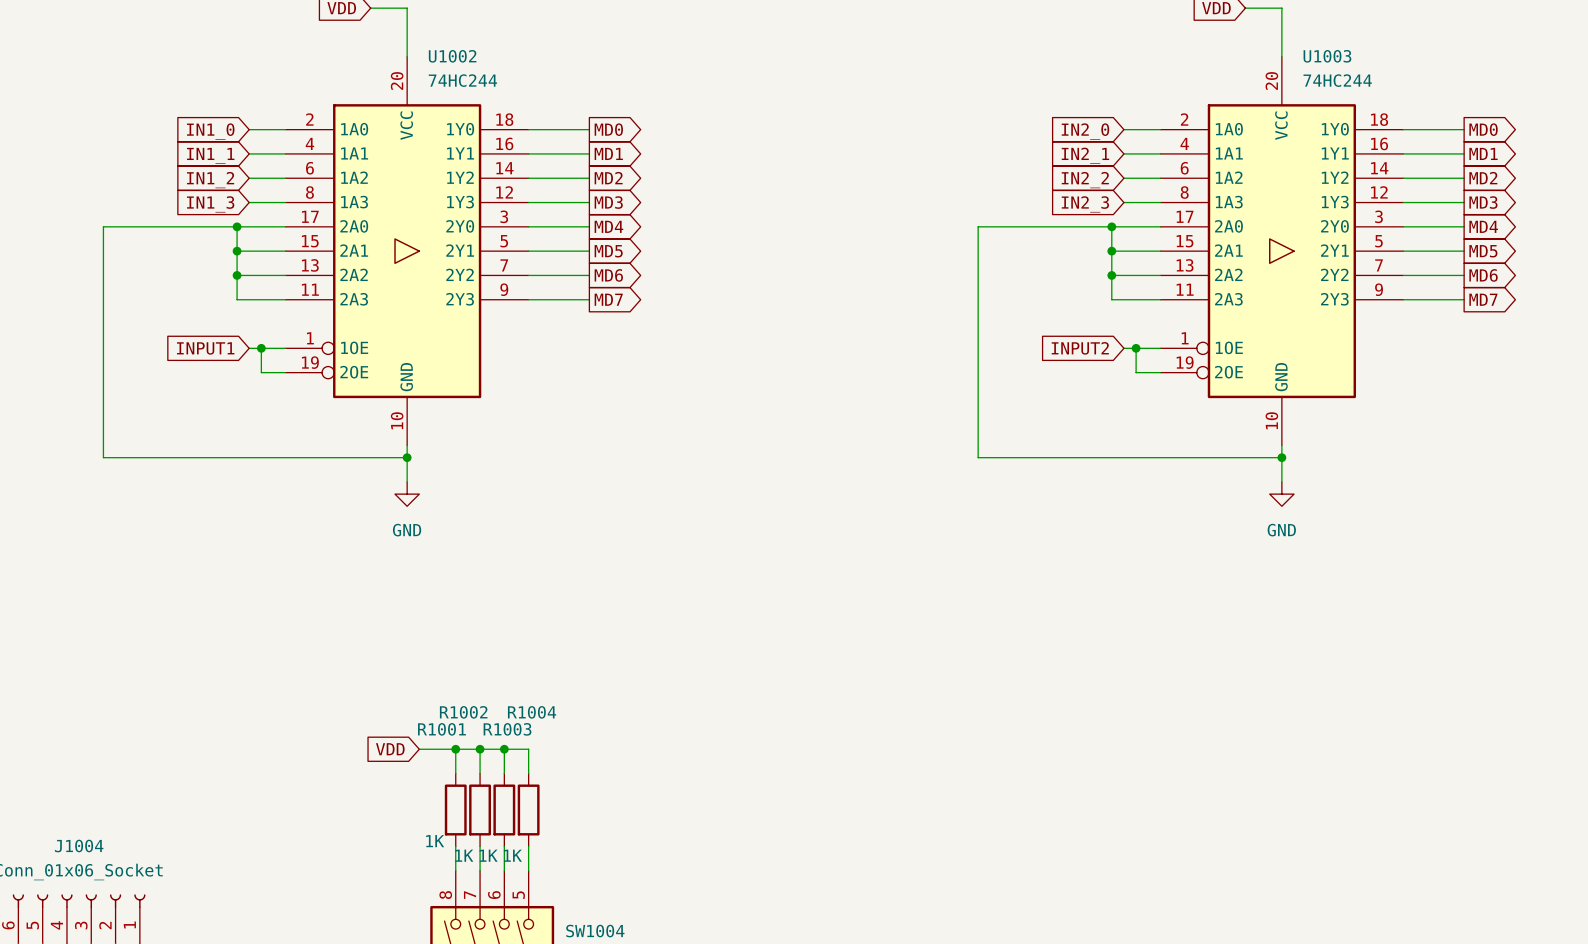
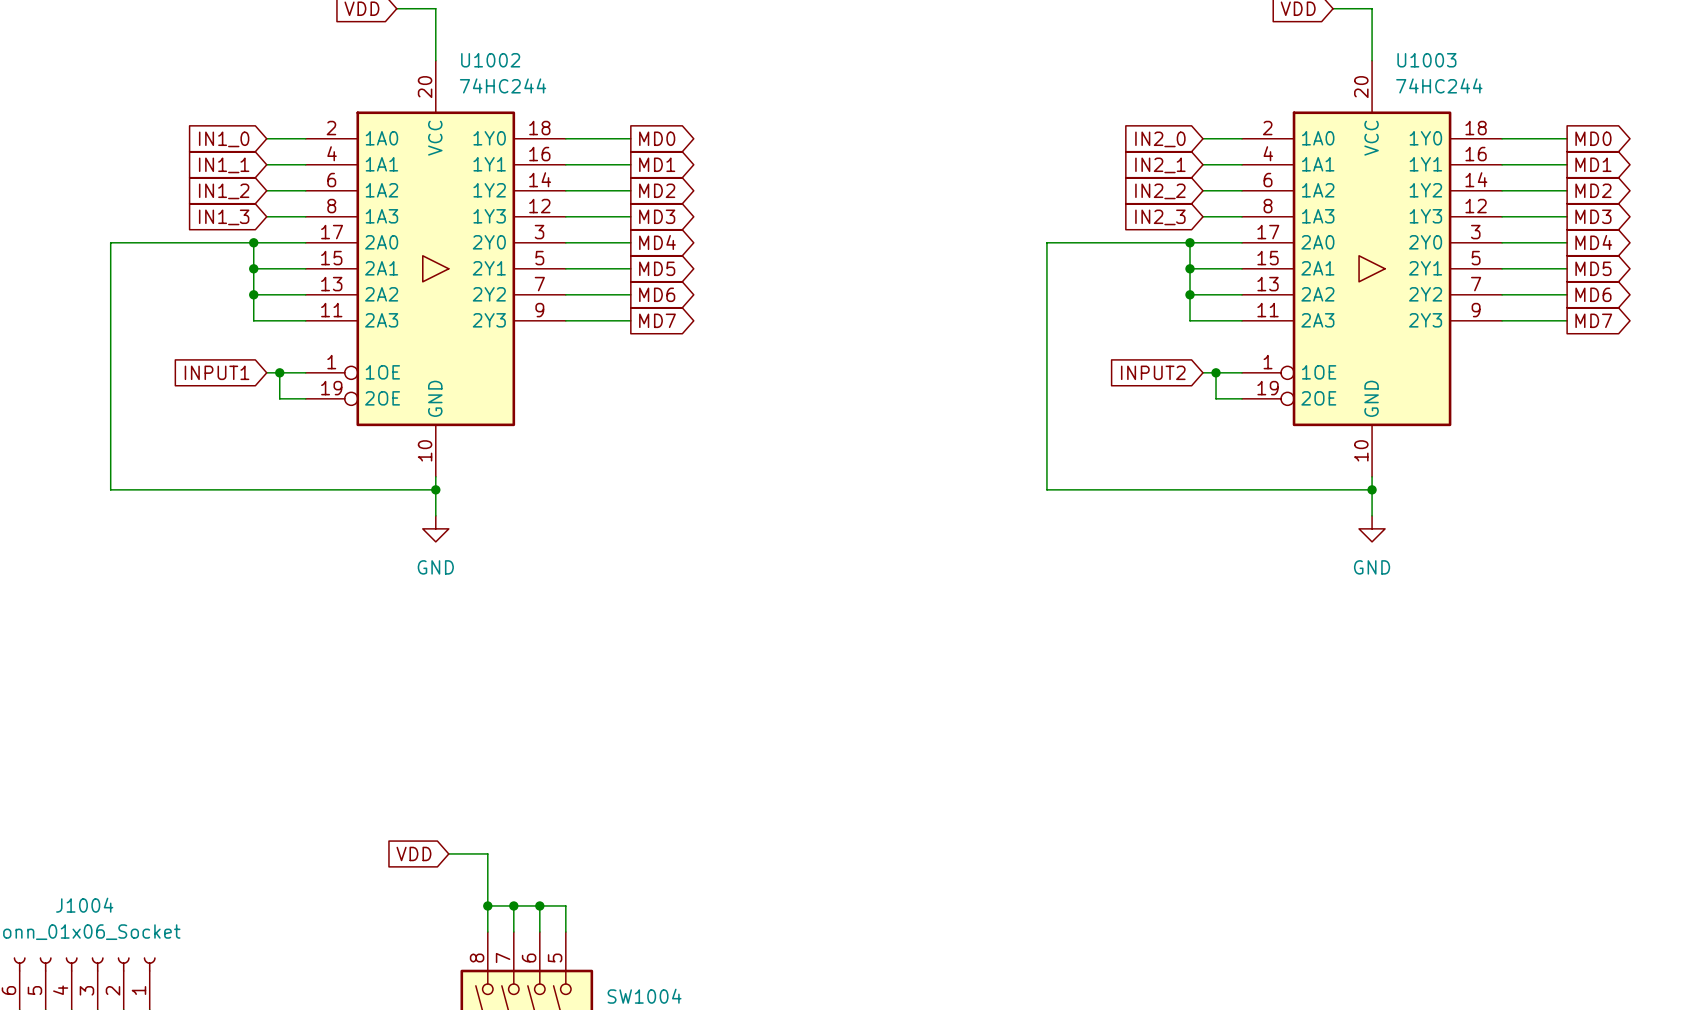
global label position: VDD (390, 749) -> VDD (413, 853)
wire: (419, 749) (528, 749) (528, 773) -> none
wire: (455, 749) (455, 773) -> none
junction: (455, 749) -> none
wire: (480, 749) (480, 773) -> none
junction: (480, 749) -> none
wire: (504, 749) (504, 773) -> none
junction: (504, 749) -> none
wire: none -> (448, 853) (487, 853) (487, 905) (565, 905)
R1001: 1K (455, 810) -> none
R1002: 1K (480, 810) -> none
R1003: 1K (504, 810) -> none
R1004: 1K (528, 810) -> none
junction: none -> (487, 905)
junction: none -> (513, 905)
junction: none -> (539, 905)

